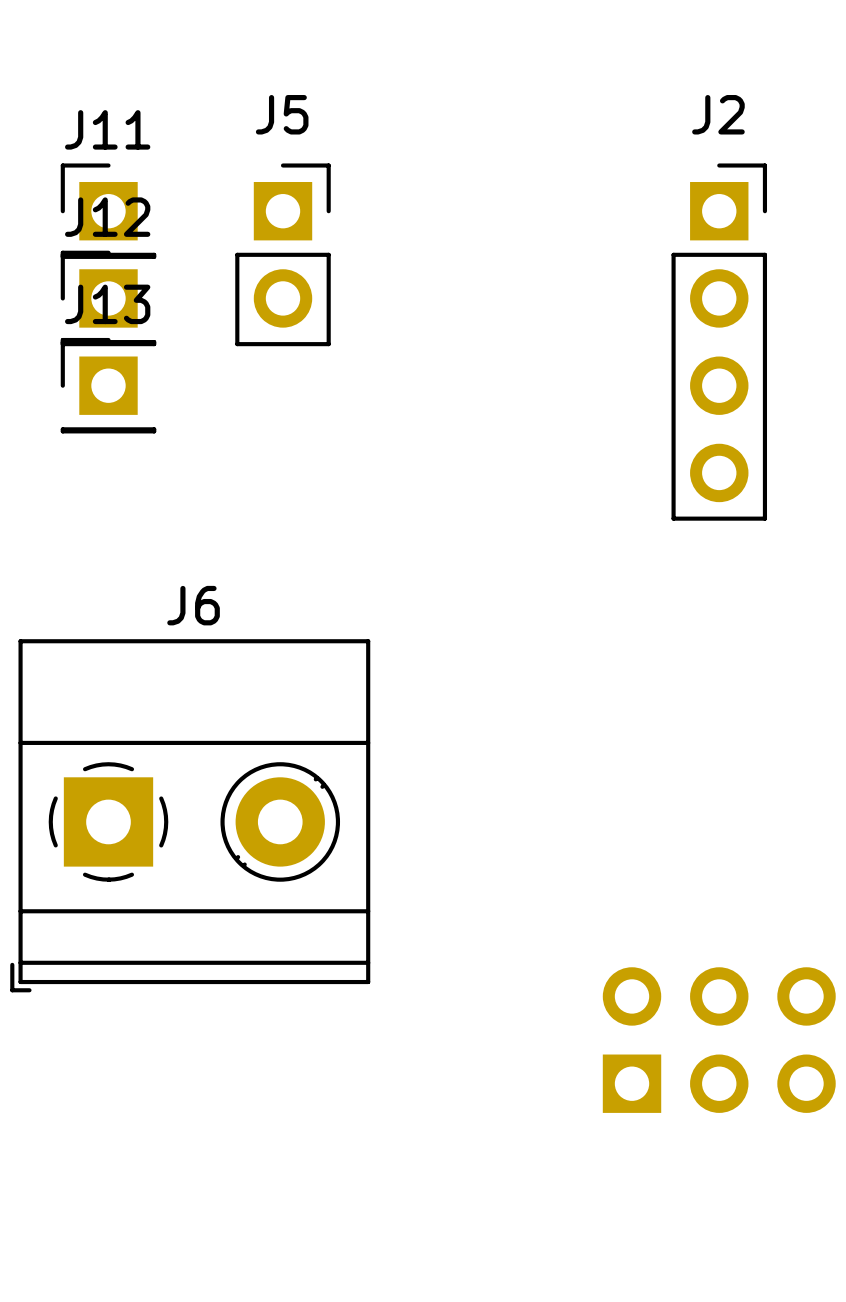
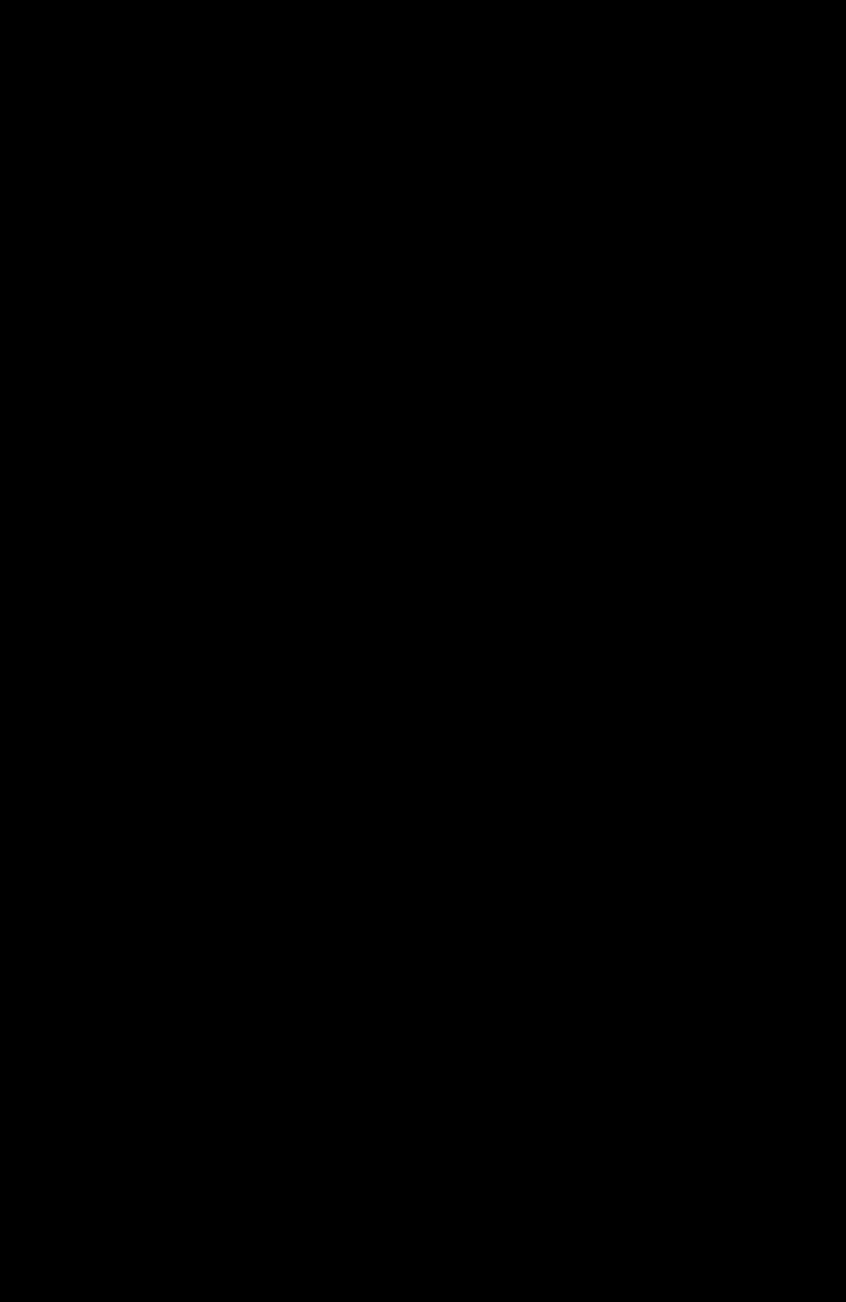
J11: (108, 211) -> none
J5: (283, 254) -> none
J12: (108, 298) -> none
J2: (719, 342) -> none
J13: (108, 385) -> none
J6: (190, 815) -> none
part: (719, 1040) -> none

